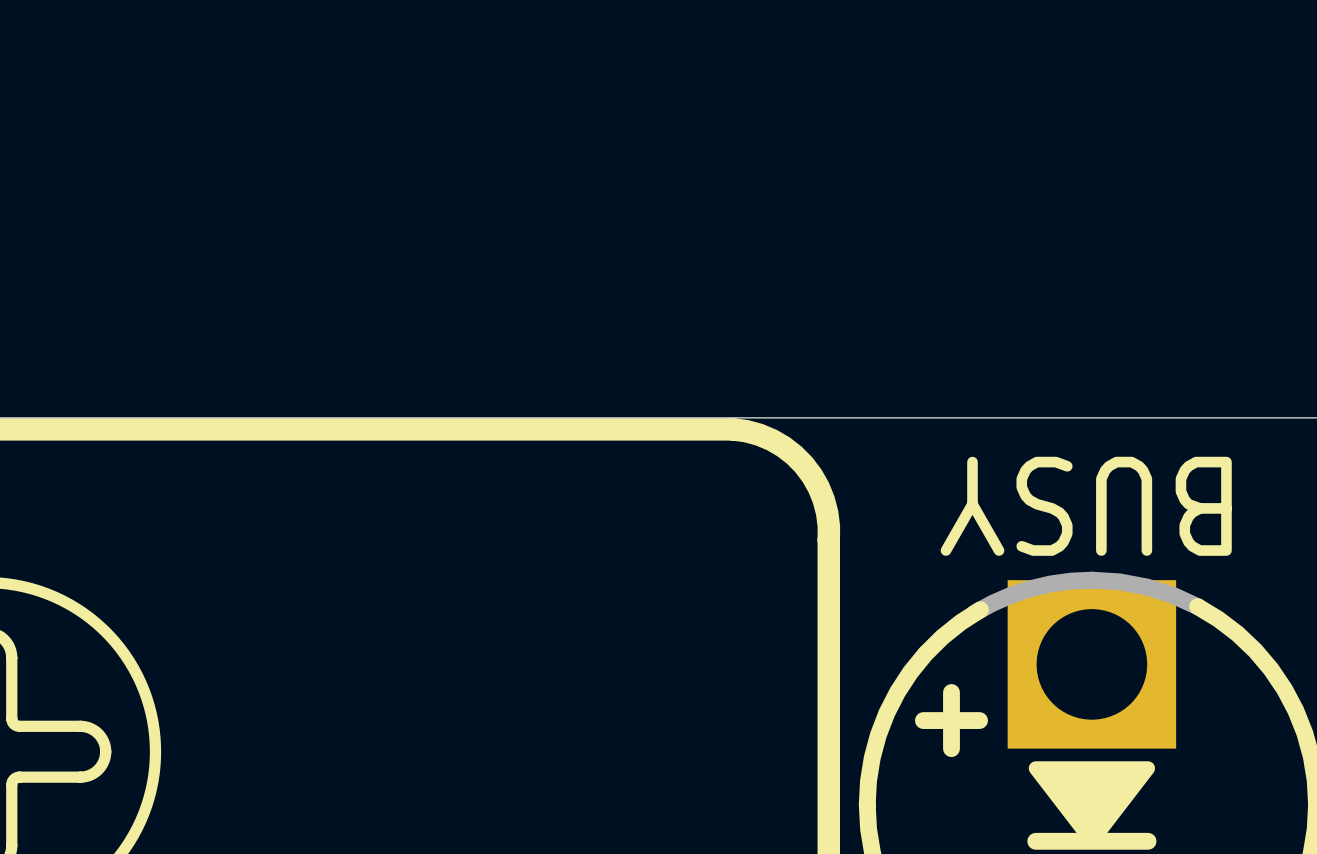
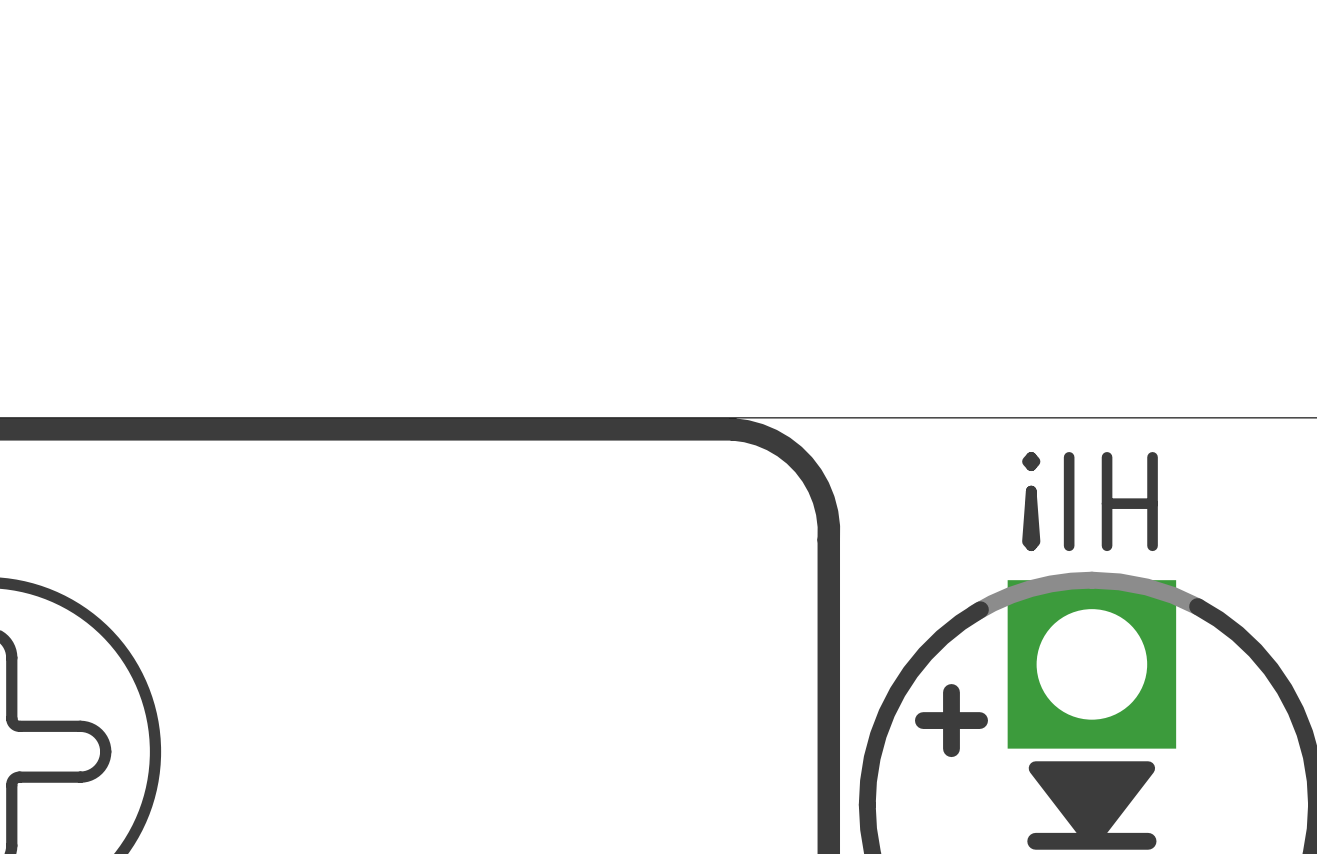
BUSY name: BUSY (1086, 506) -> HI! (1090, 501)

